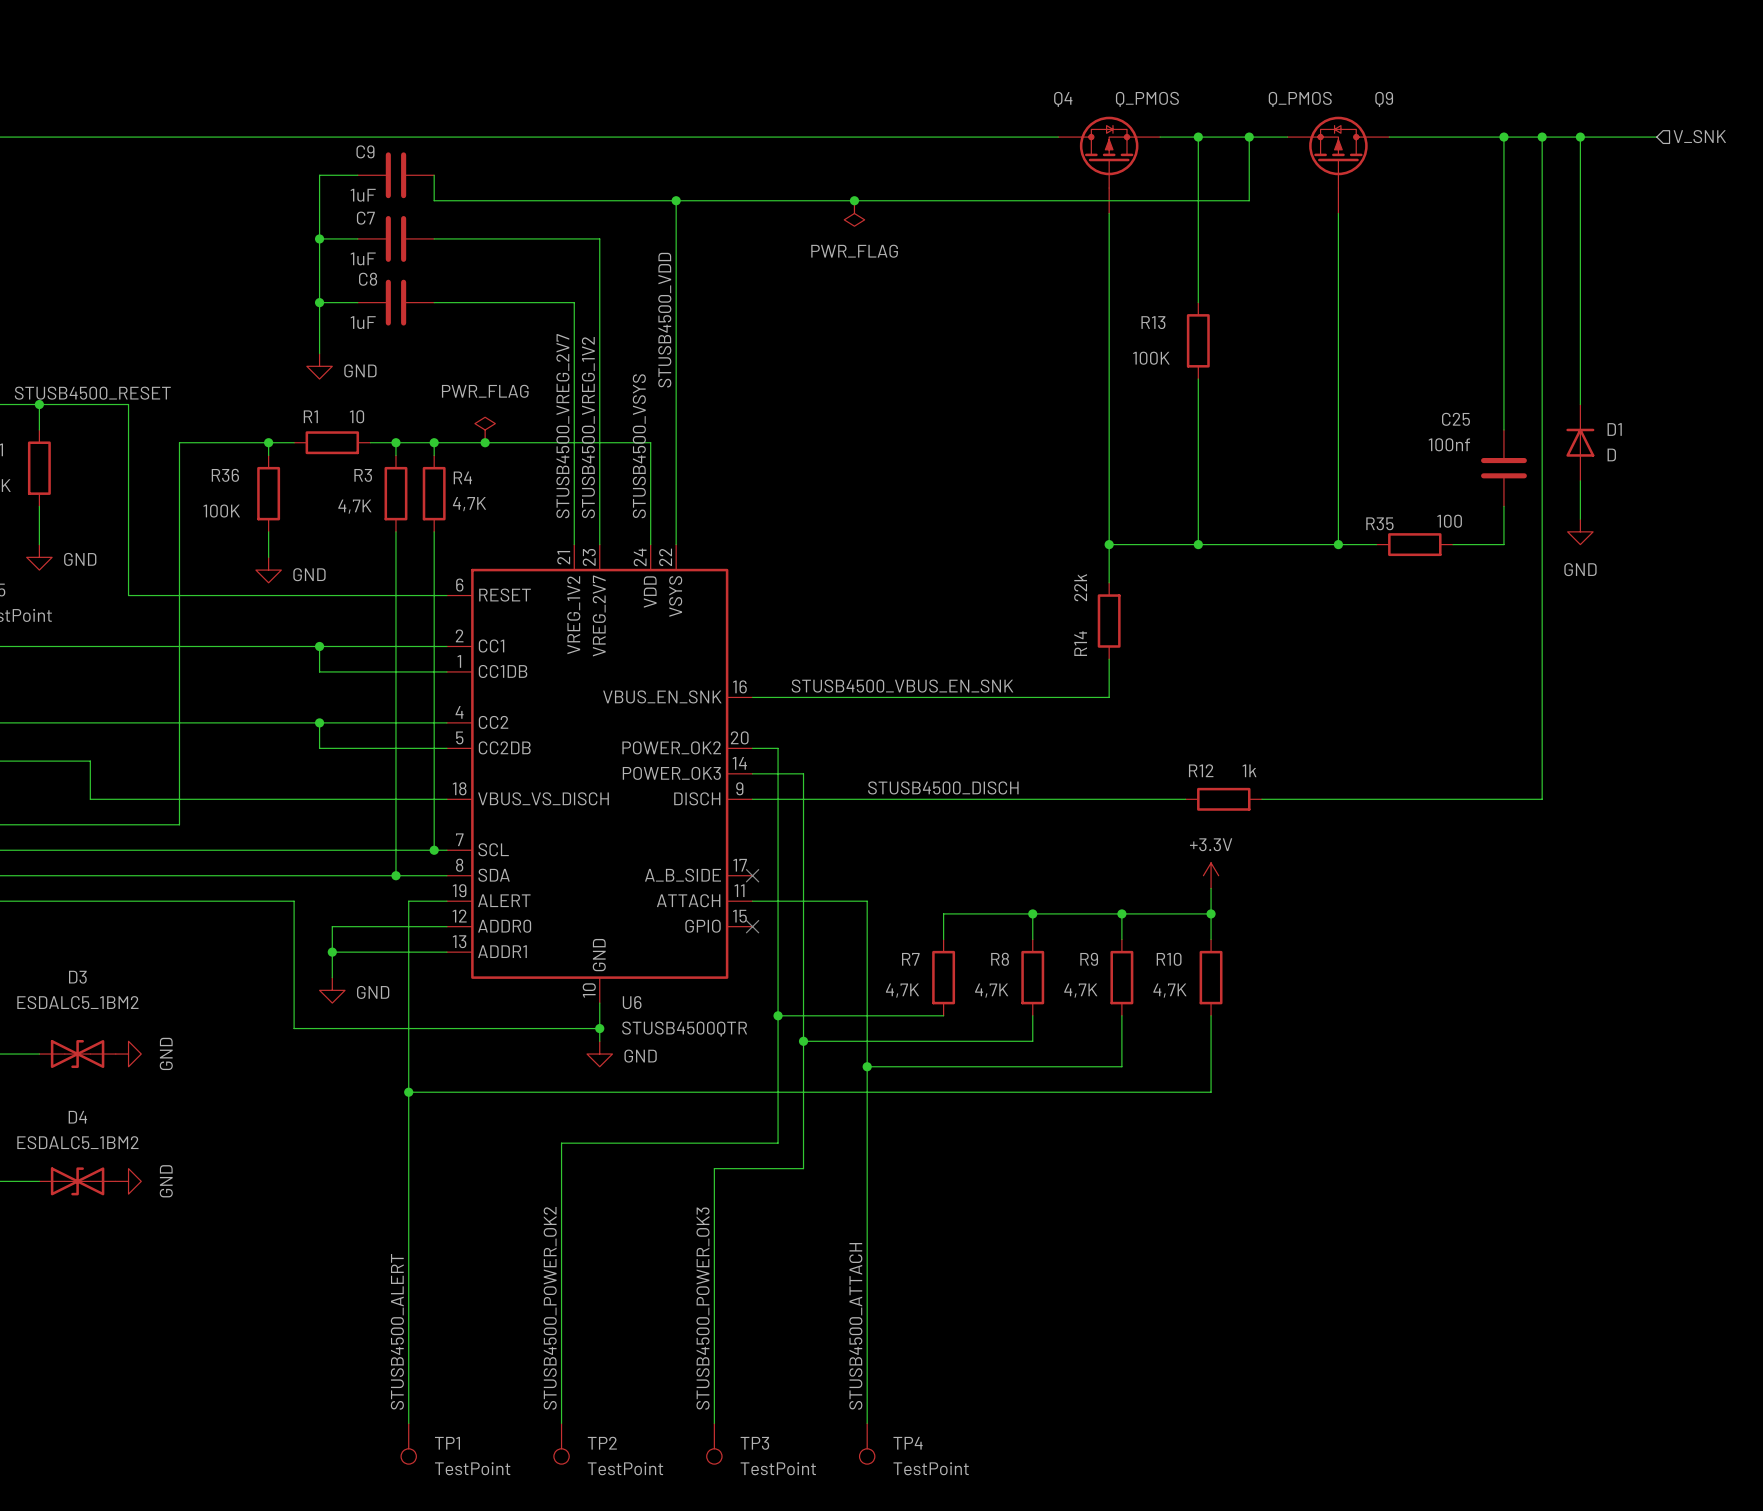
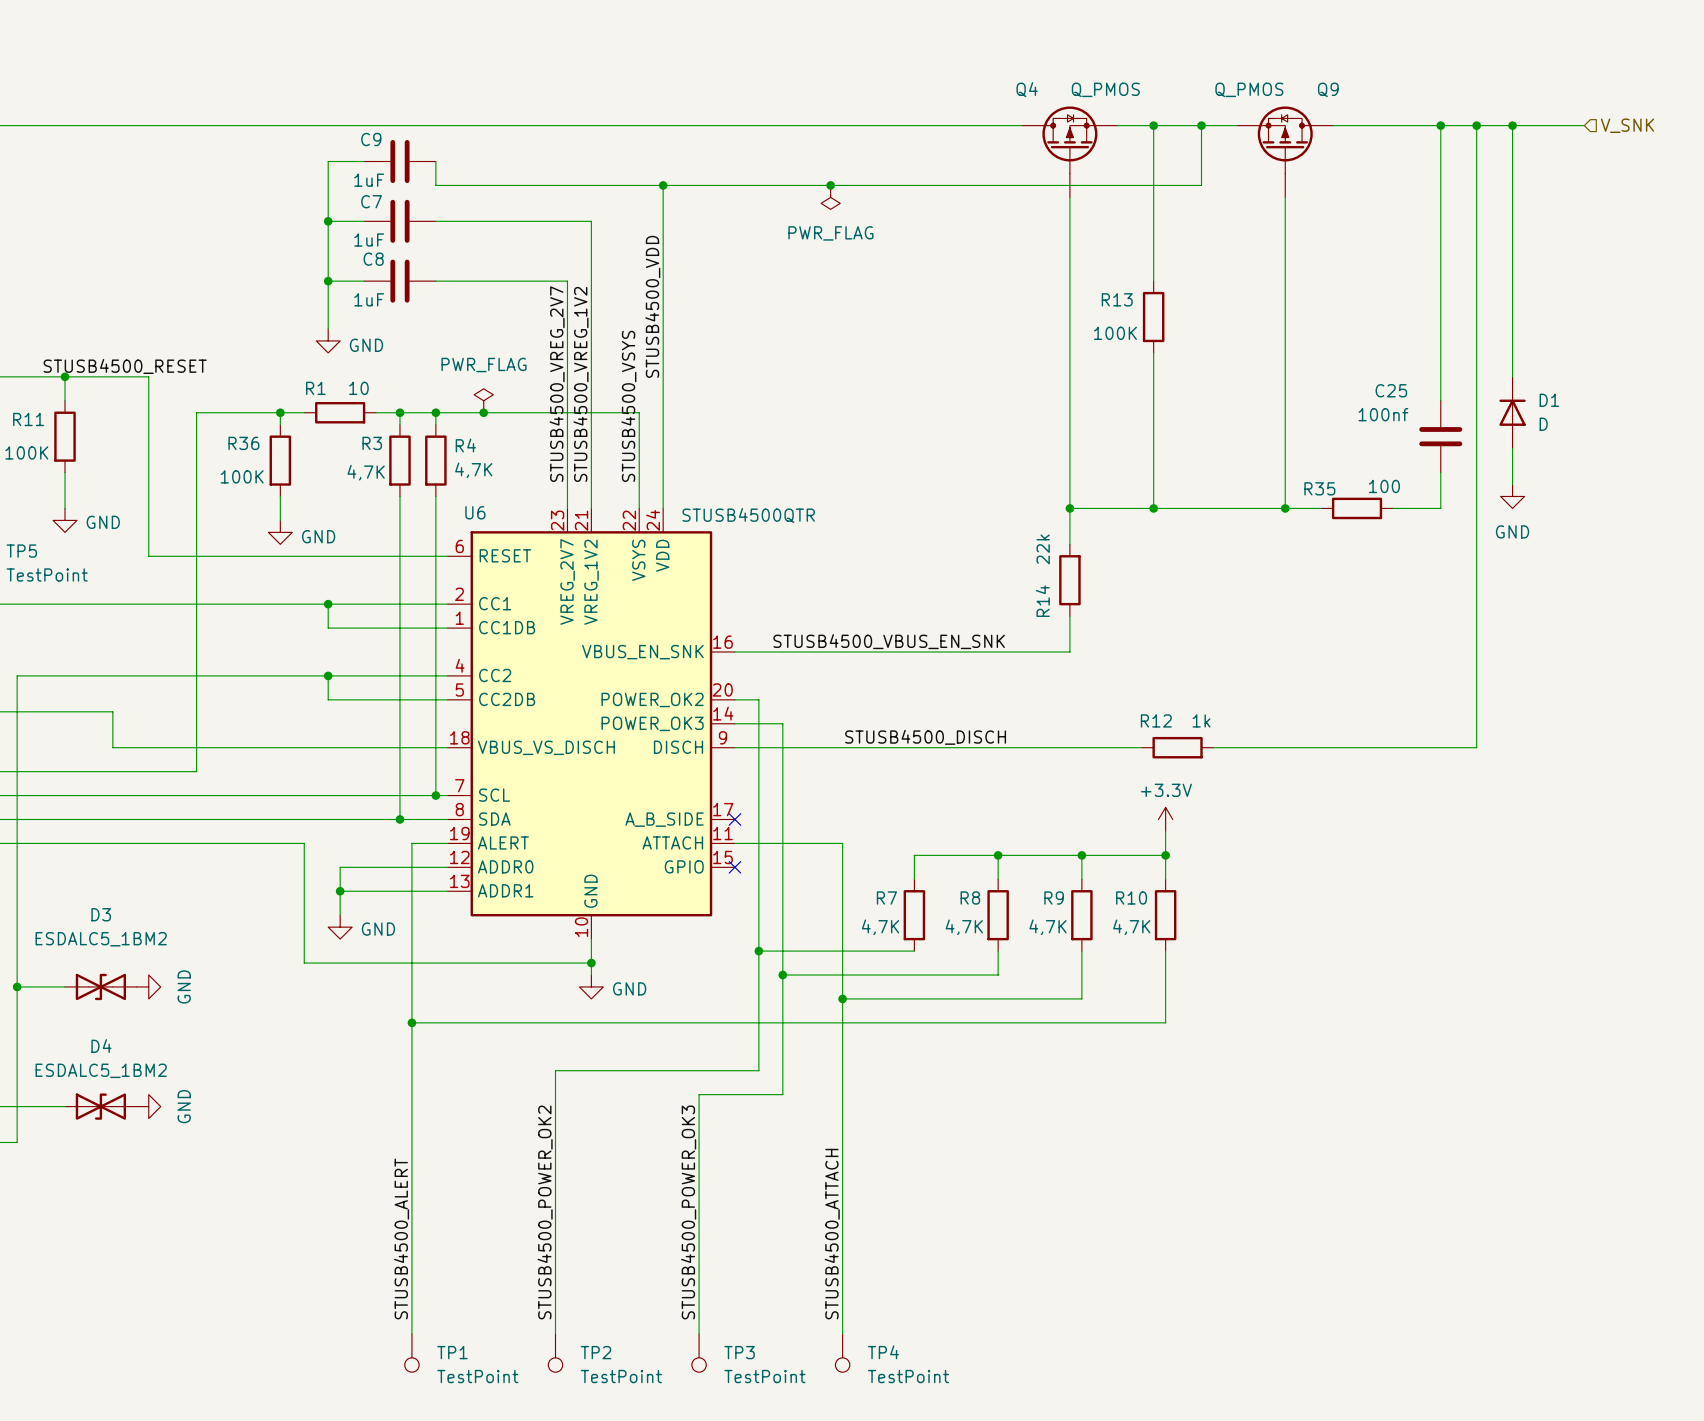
U6 pin number: 21 (563, 557) -> 23 (557, 520)
U6 pin number: 23 (589, 557) -> 21 (581, 520)
U6 pin number: 24 (640, 557) -> 22 (629, 520)
U6 pin number: 22 (665, 557) -> 24 (653, 520)
U6 pin name: VDD (650, 592) -> VSYS (638, 560)
U6 pin name: VSYS (675, 596) -> VDD (662, 555)
U6 pin name: VREG_1V2 (573, 615) -> VREG_2V7 (567, 581)
U6 pin name: VREG_2V7 (599, 615) -> VREG_1V2 (591, 582)
U6 name position: U6 (632, 1002) -> U6 (475, 512)
U6 value position: STUSB4500QTR (684, 1029) -> STUSB4500QTR (748, 515)

